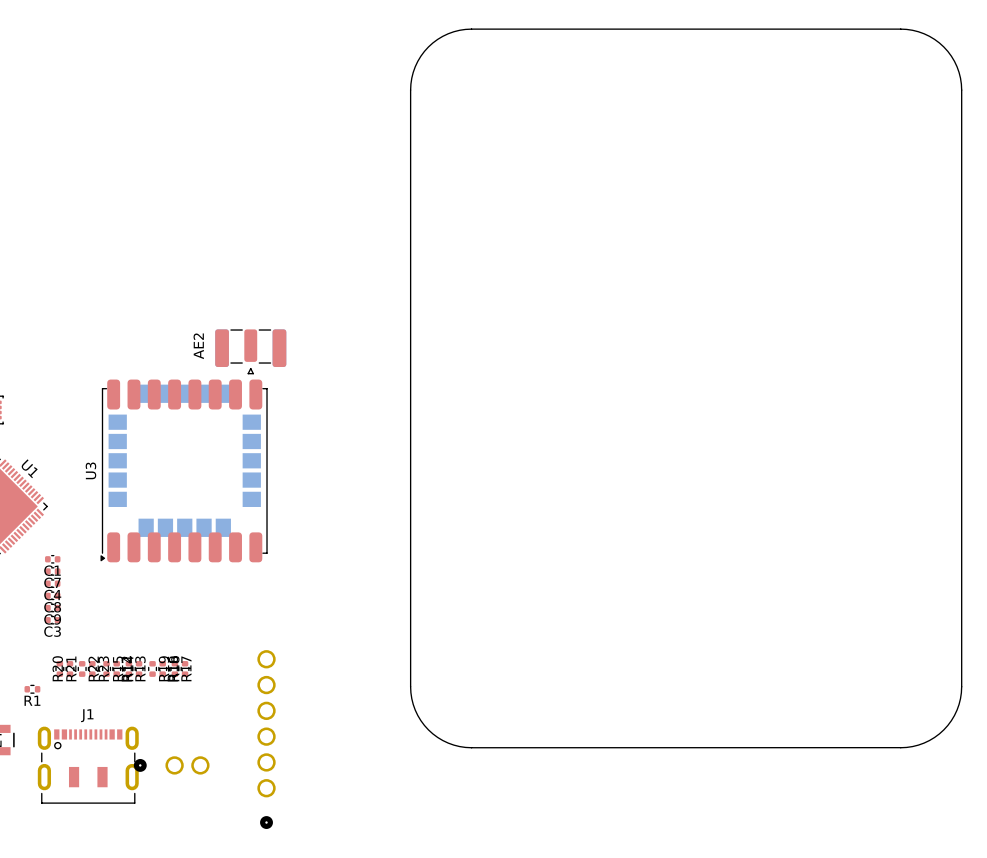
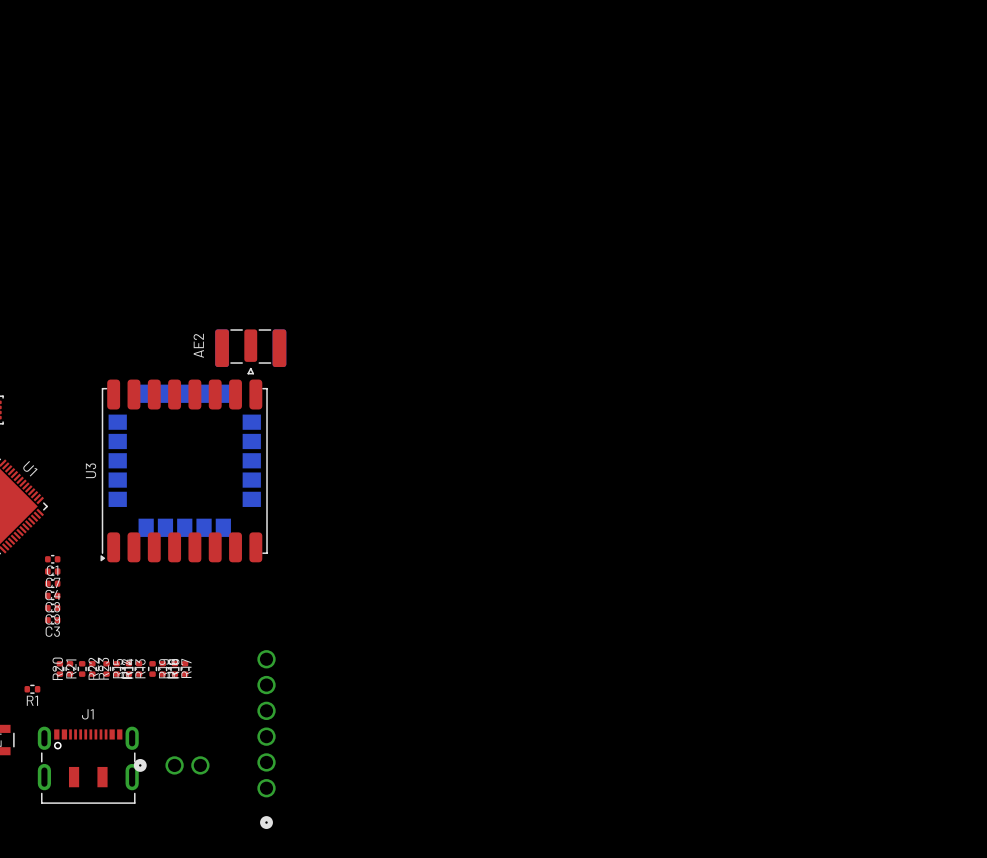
board edge: (900, 747) (465, 747) (448, 743) (437, 737) (420, 720) (413, 704) (410, 686) (410, 90) (411, 78) (417, 61) (424, 51) (437, 39) (453, 31) (471, 29) (900, 29) (918, 31) (929, 36) (939, 42) (951, 56) (959, 72) (961, 90) (961, 692) (954, 715) (939, 733) (918, 745) (900, 747) -> none

